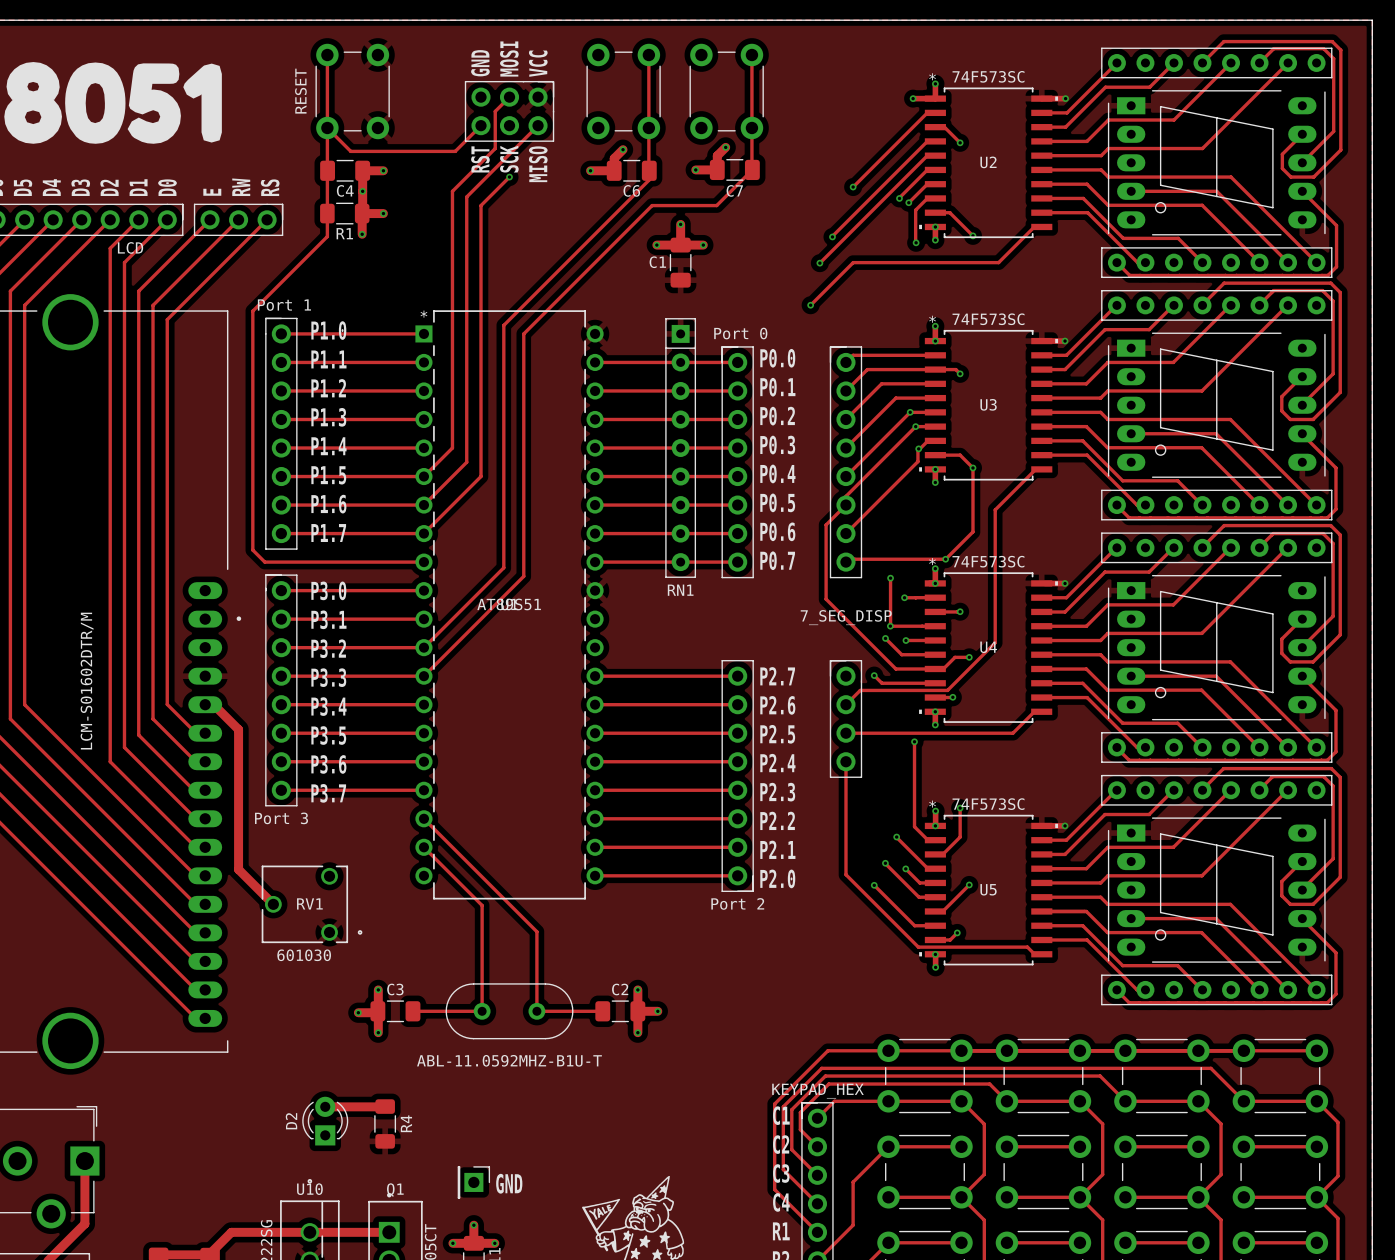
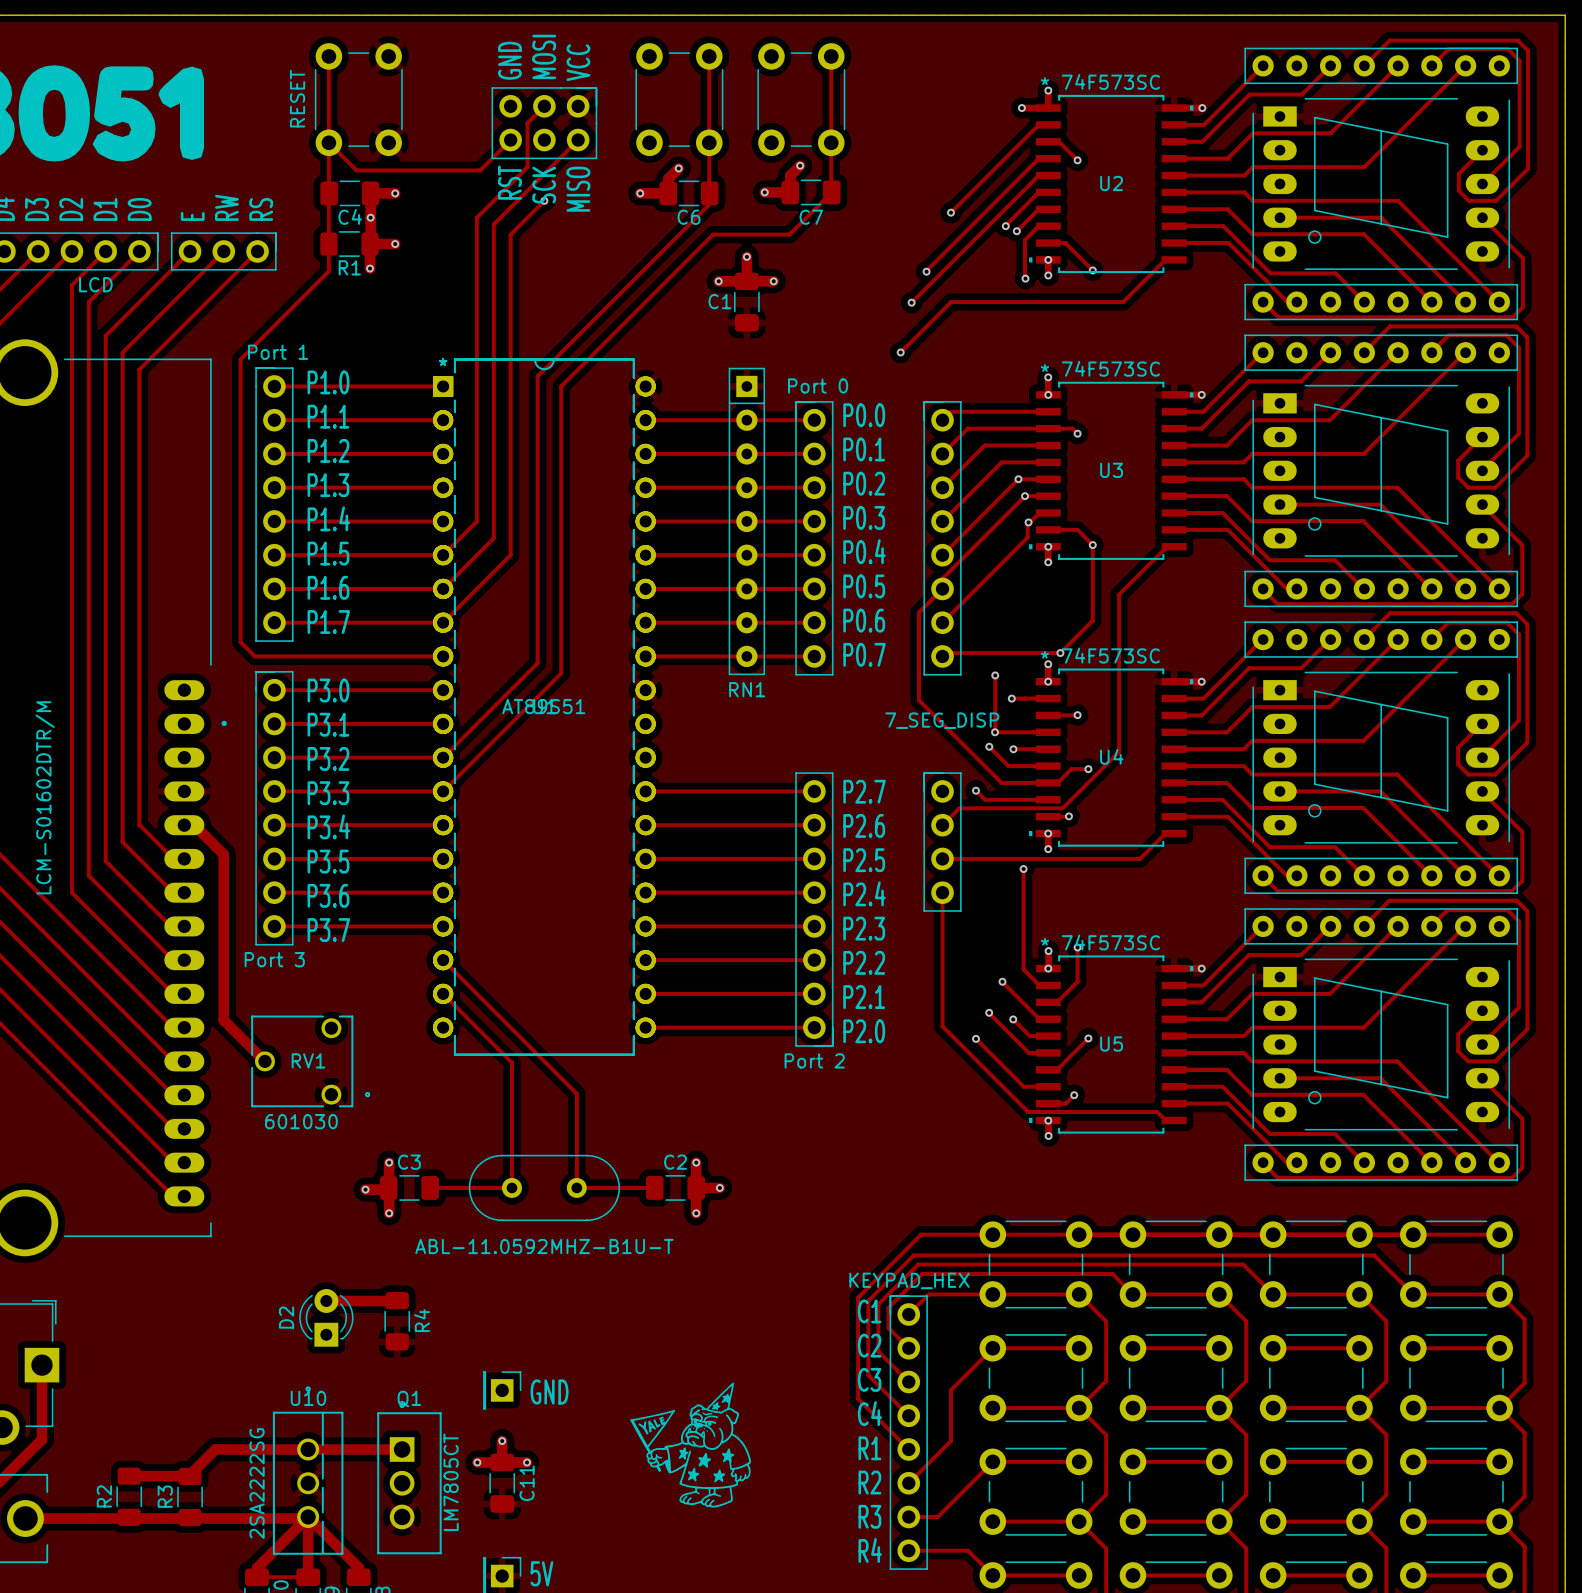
part: none -> (544, 707)

